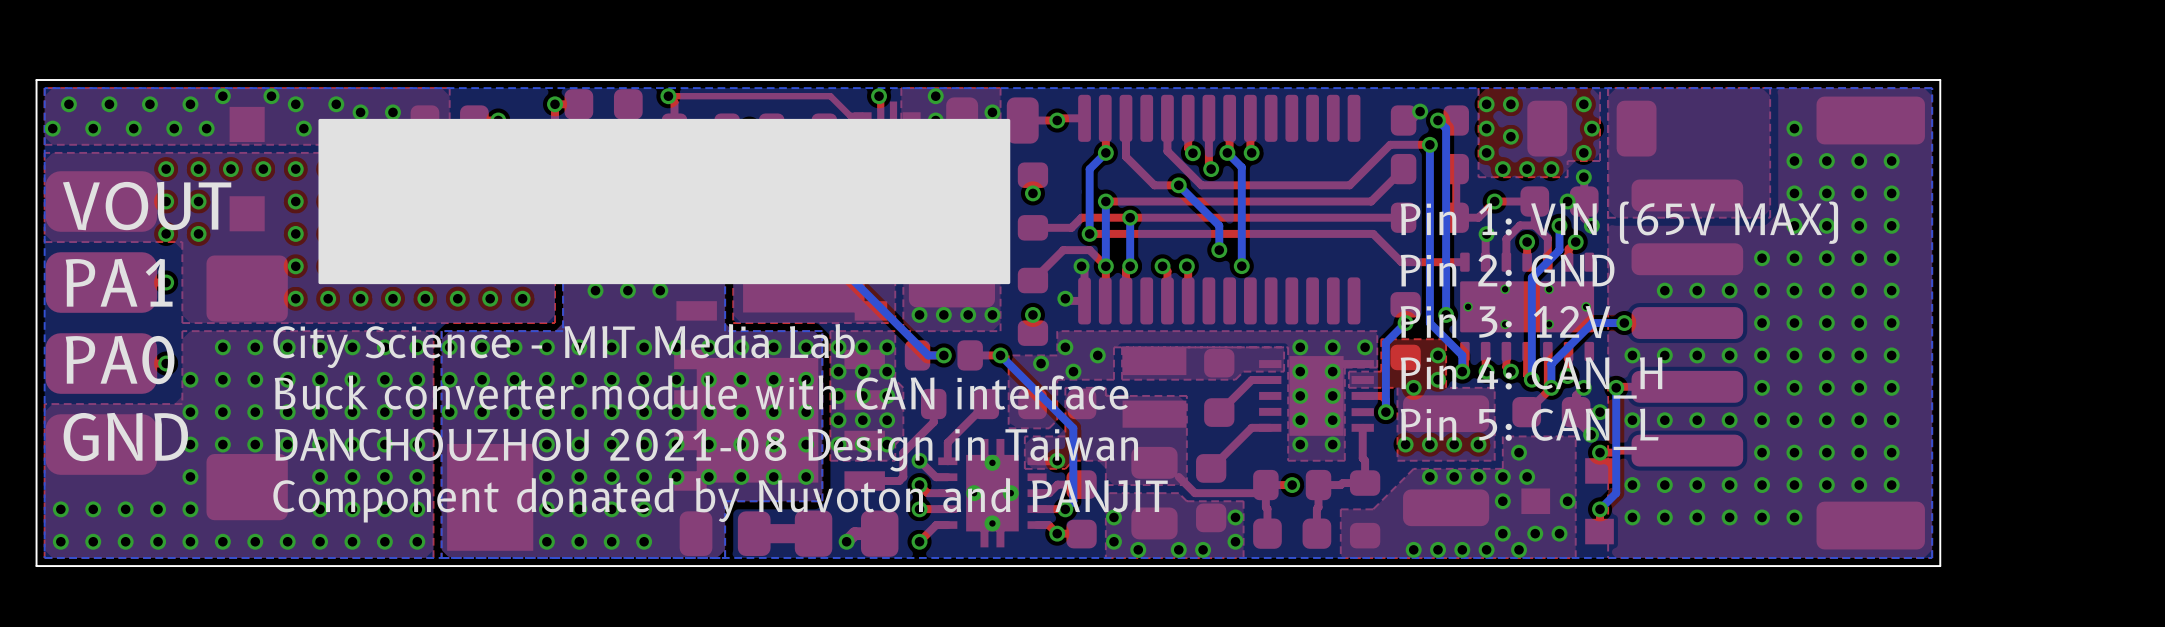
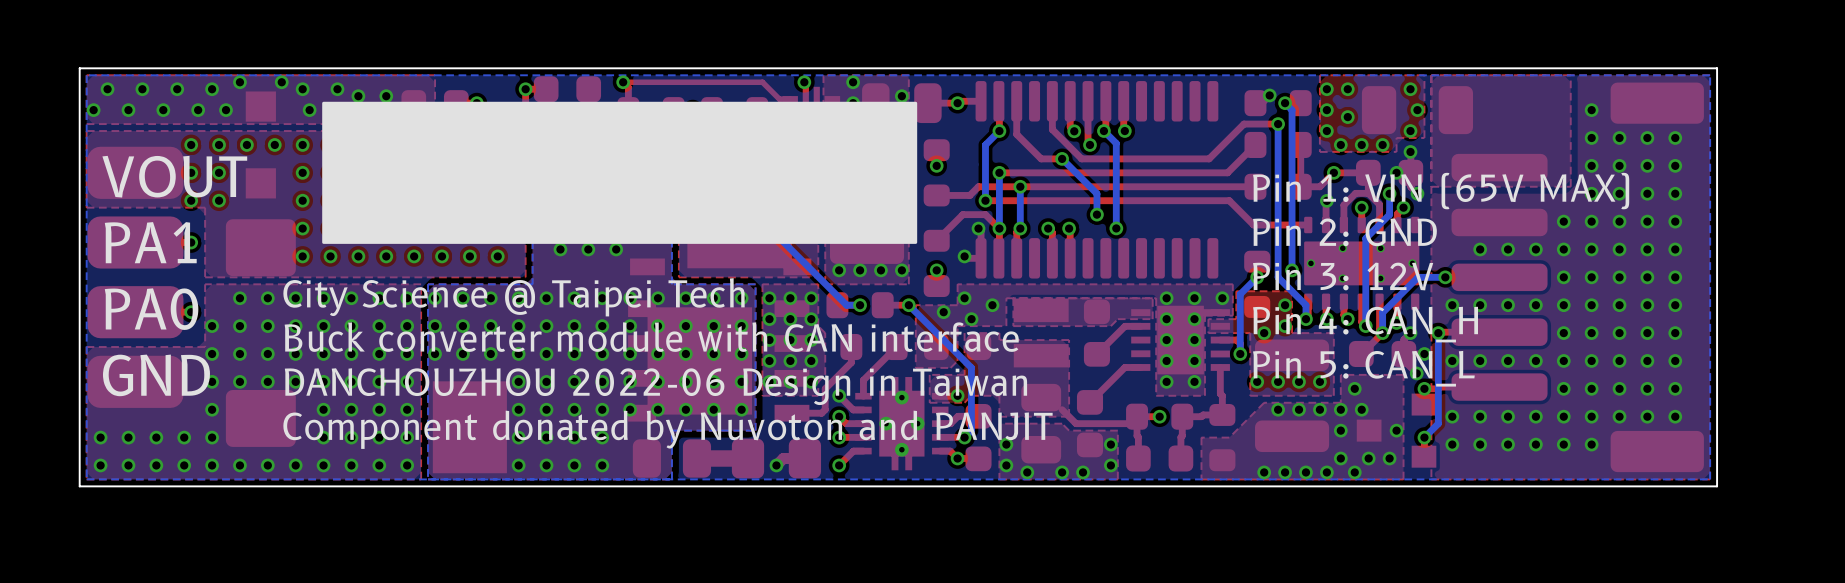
text: City Science - MIT Media Lab (564, 346) -> City Science @ Taipei Tech (514, 297)
text: DANCHOUZHOU 2021-08 Design in Taiwan (706, 450) -> DANCHOUZHOU 2022-06 Design in Taiwan (655, 386)

